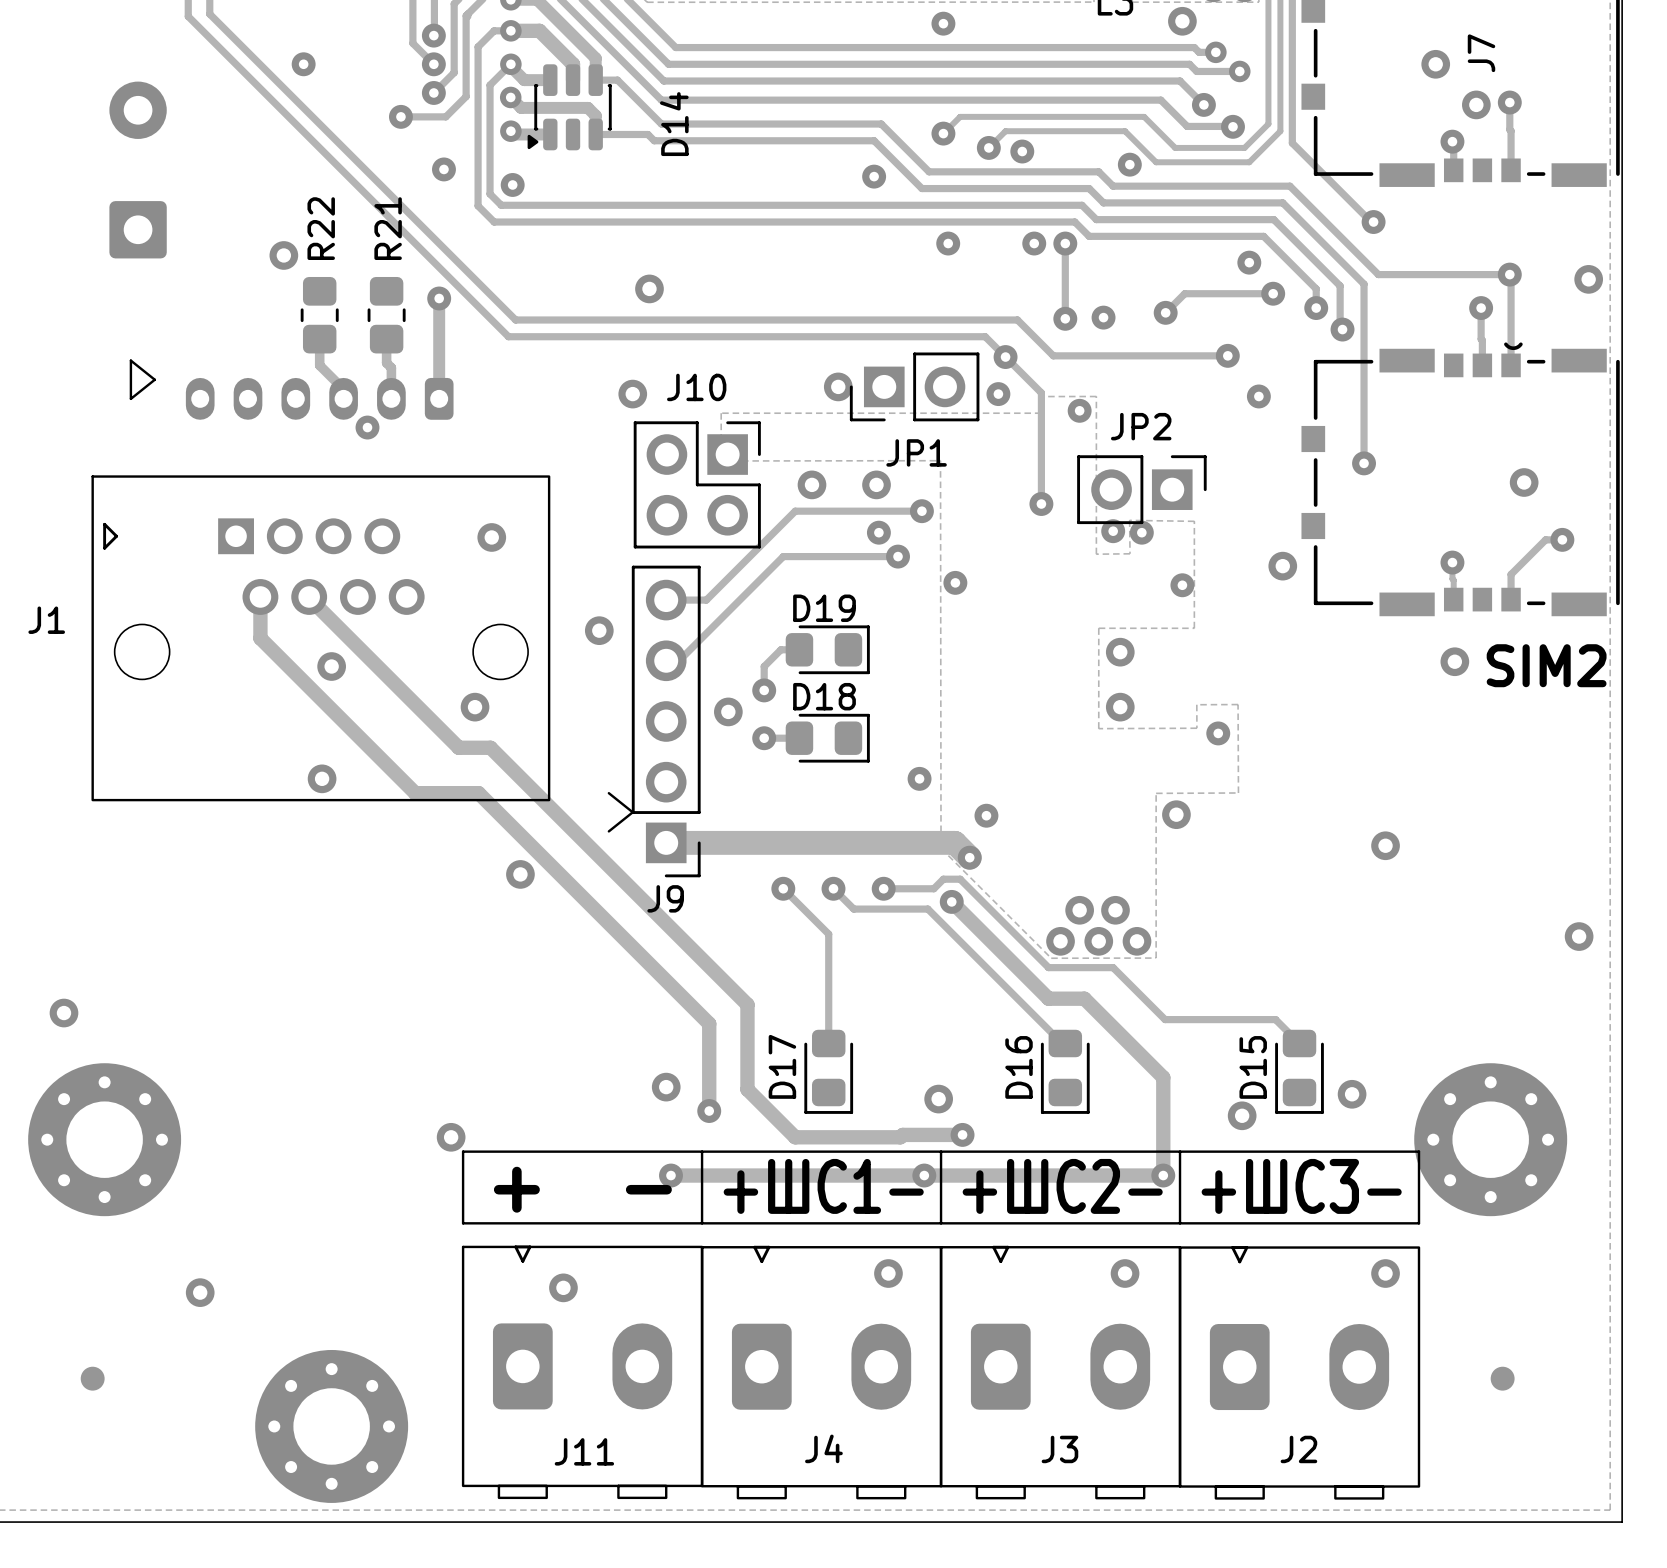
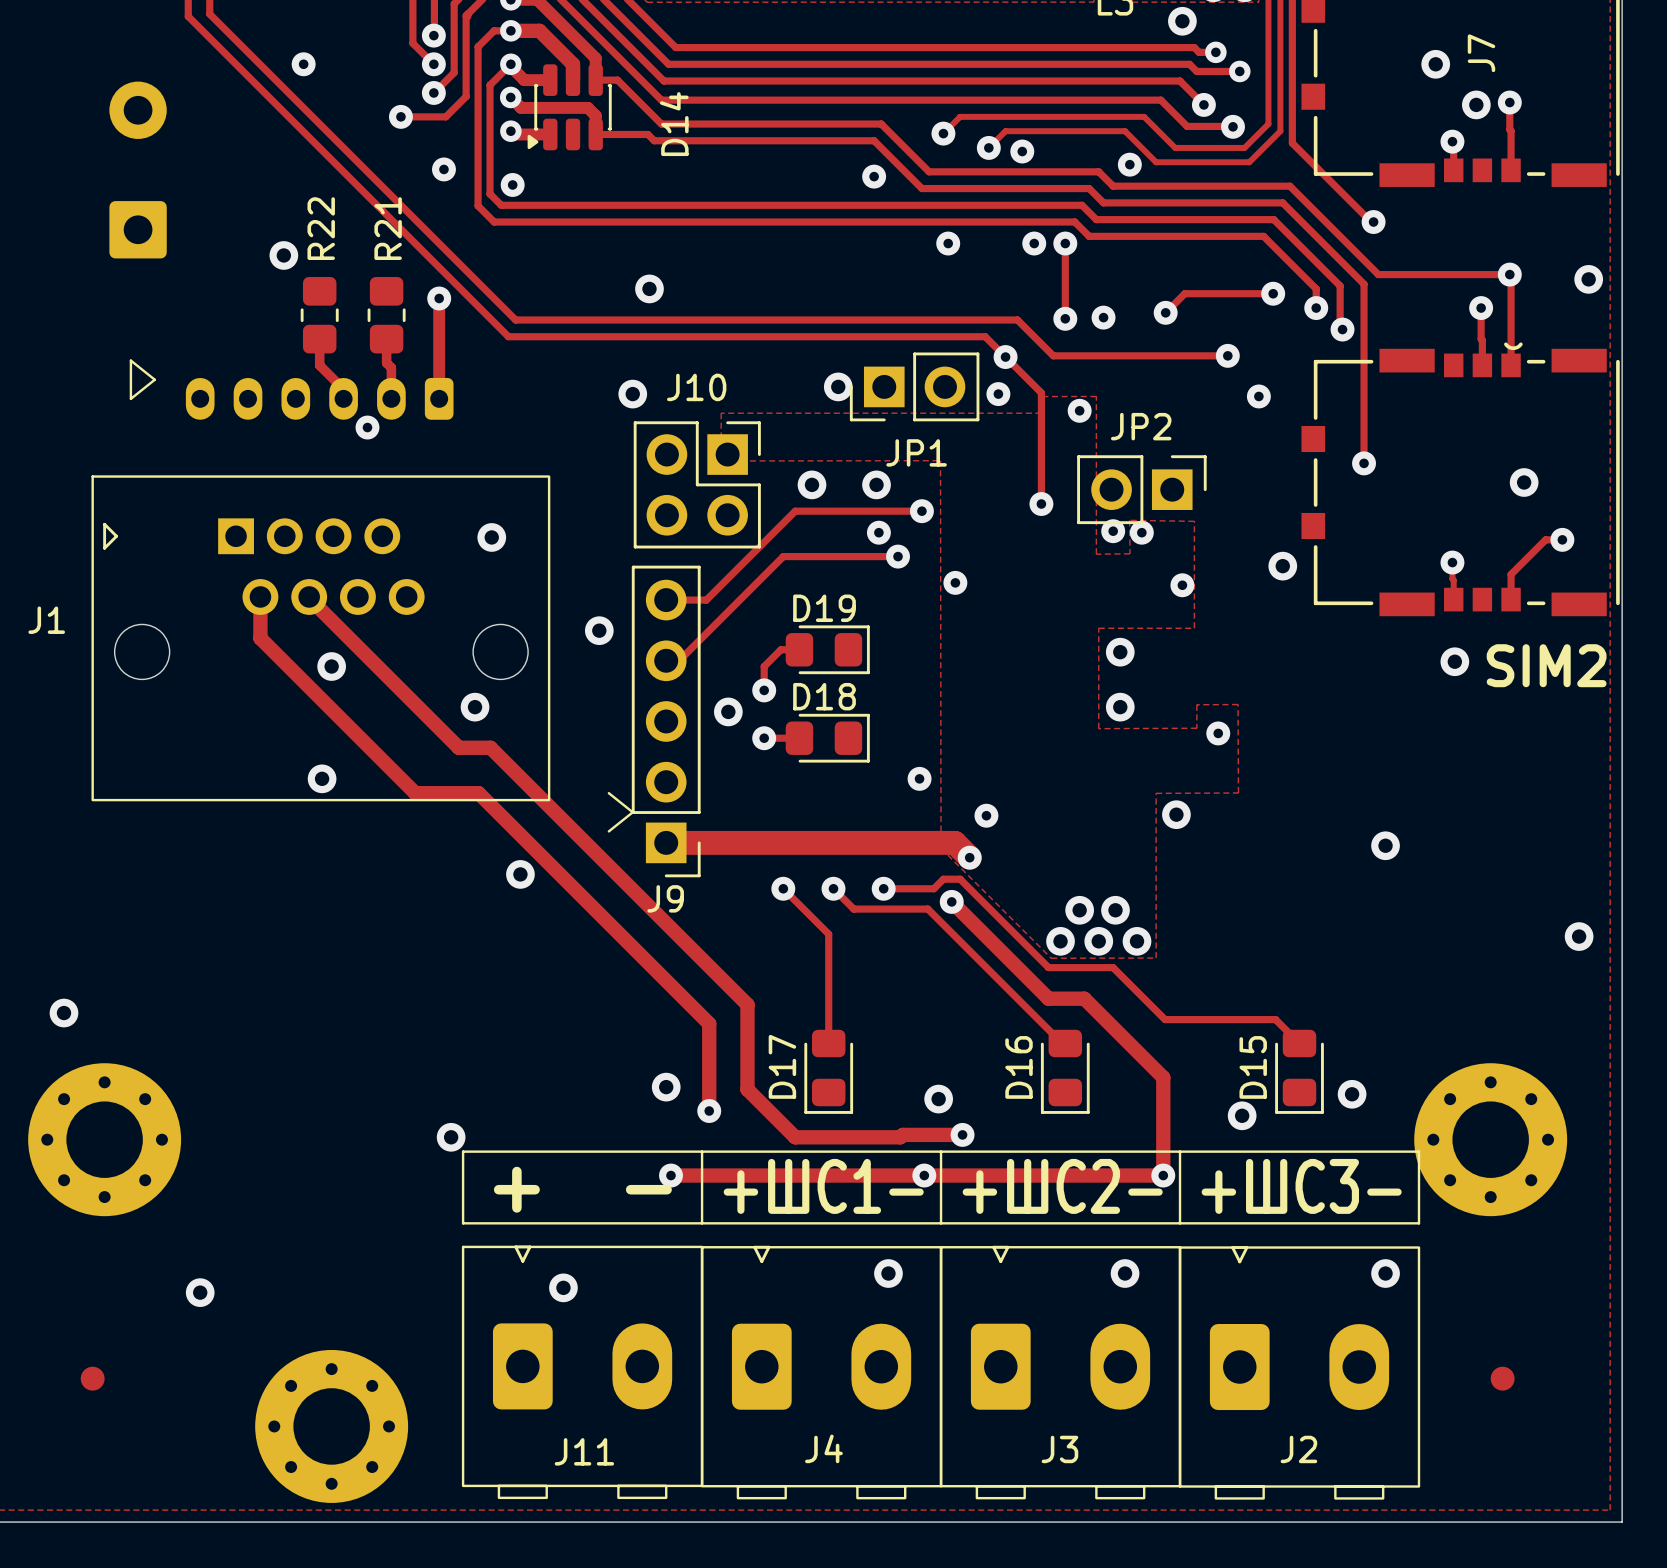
via: (943, 23) -> none
via: (1249, 262) -> none

